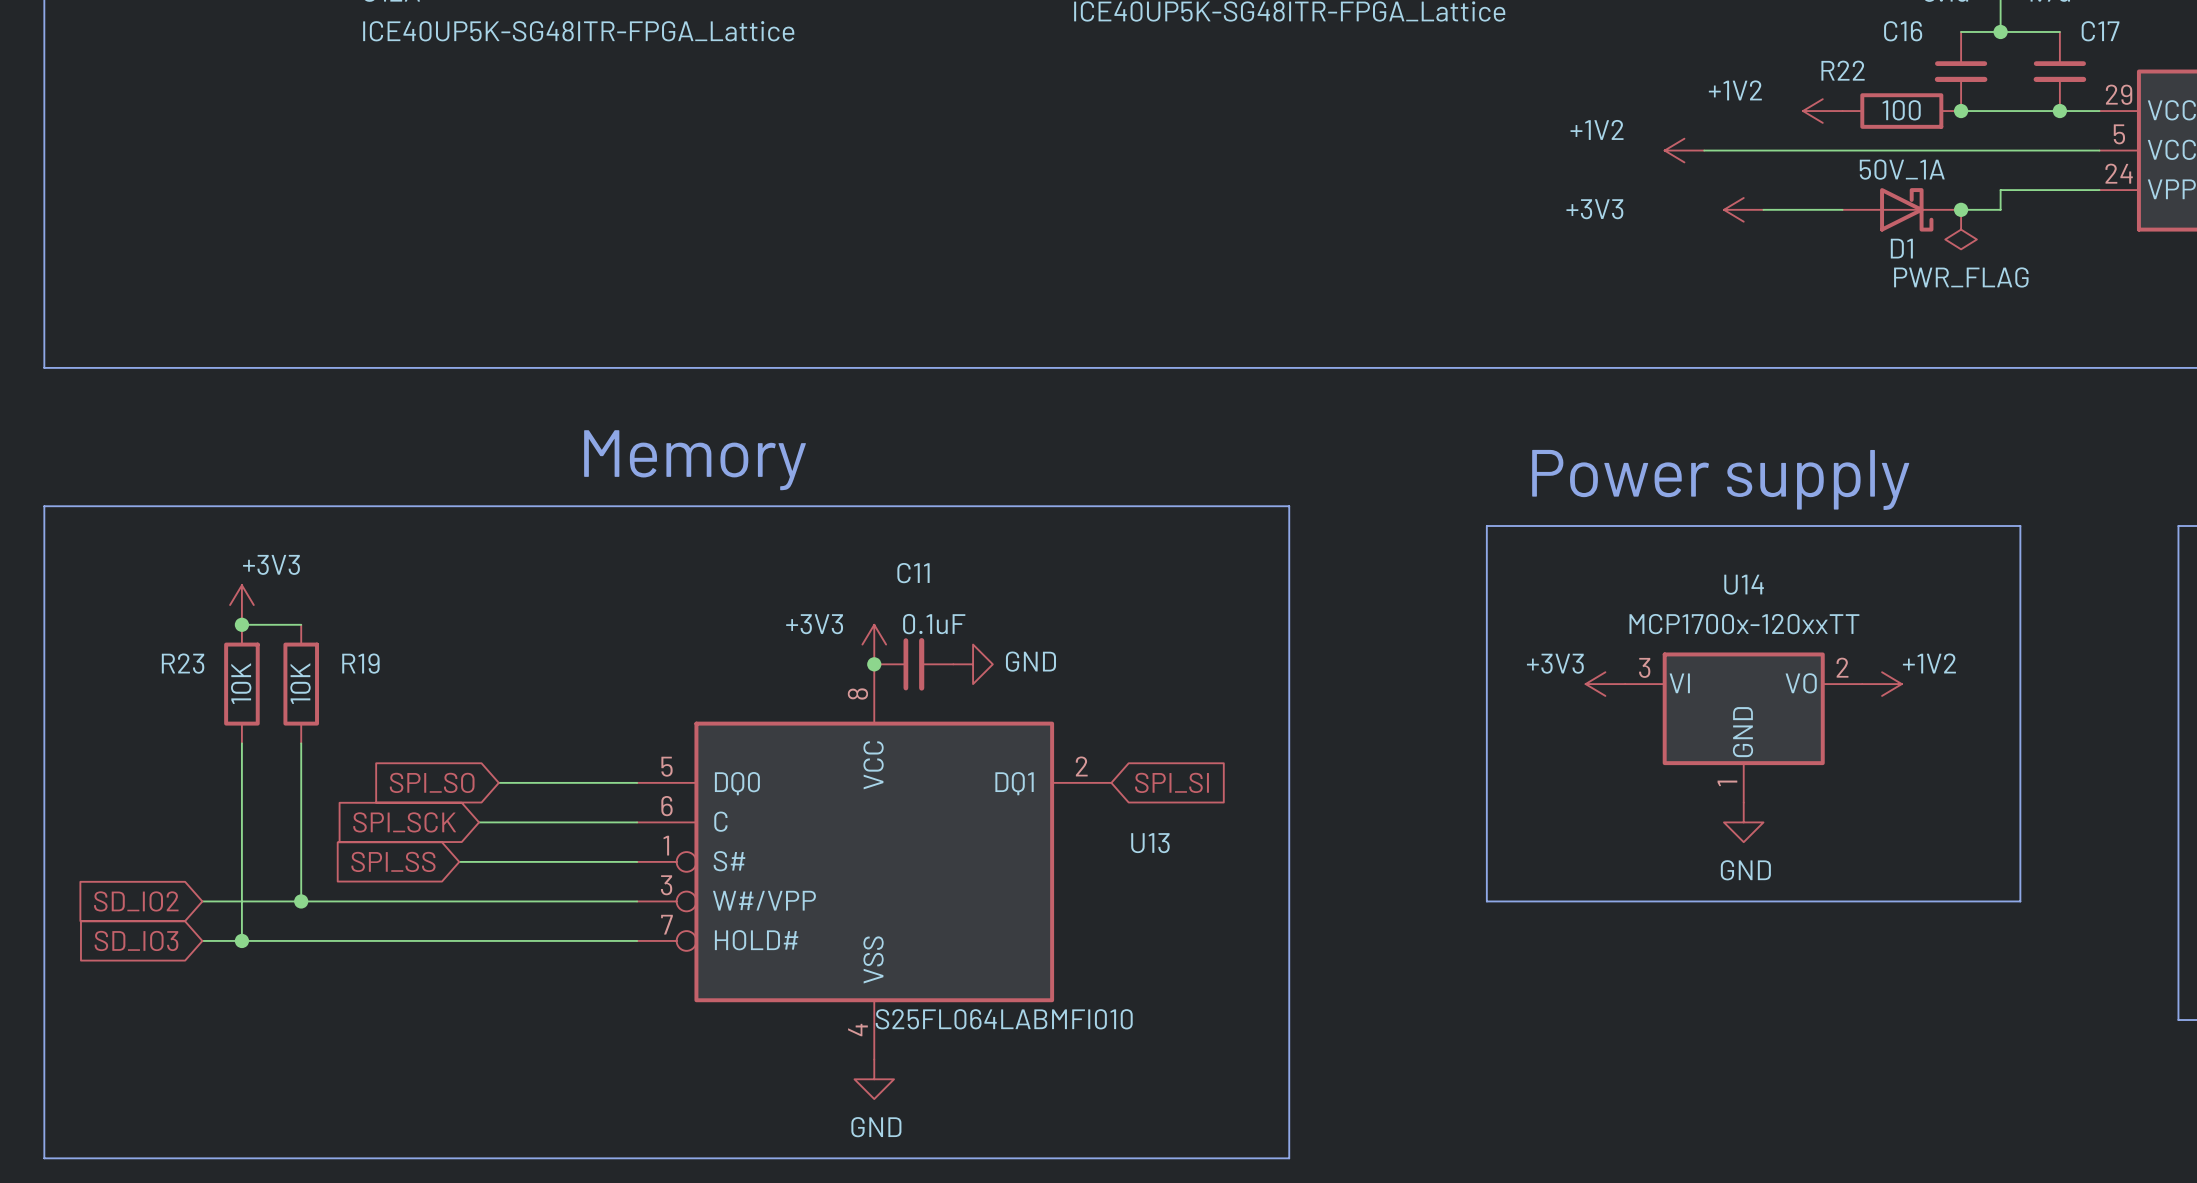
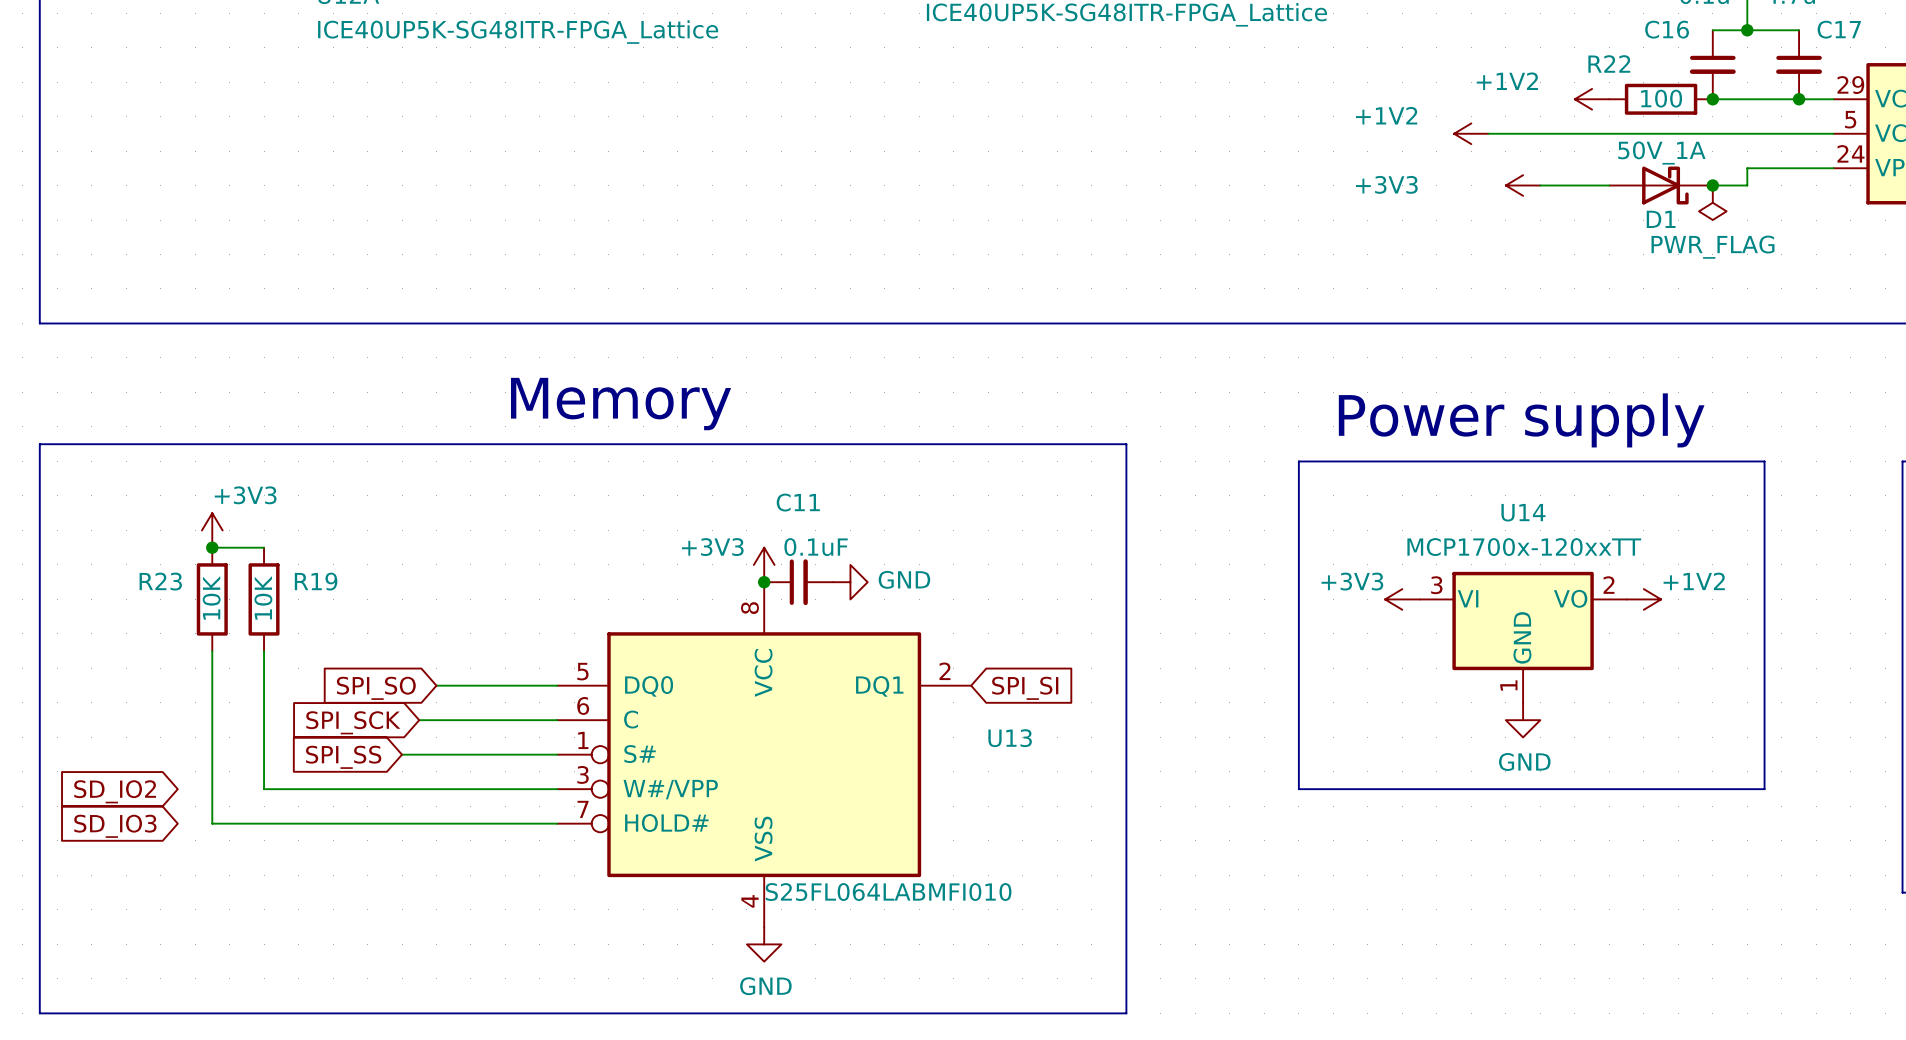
wire: (202, 901) (301, 901) -> none
junction: (301, 901) -> none
wire: (202, 940) (241, 940) -> none
junction: (241, 940) -> none

